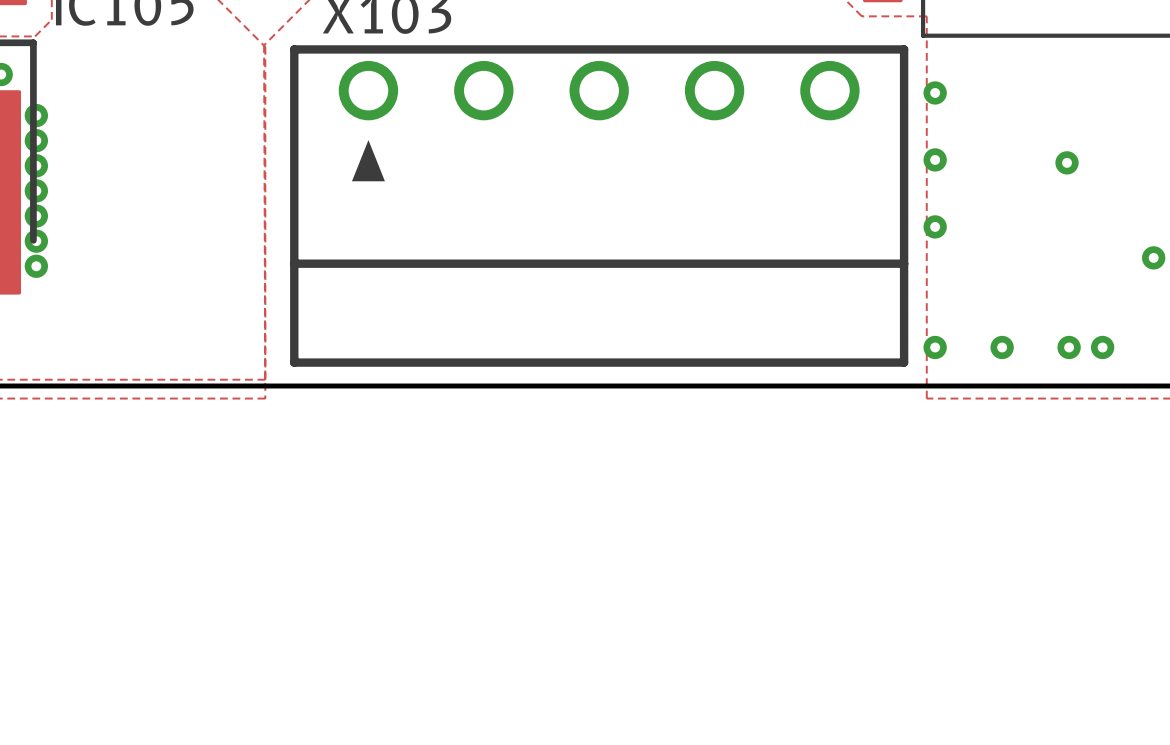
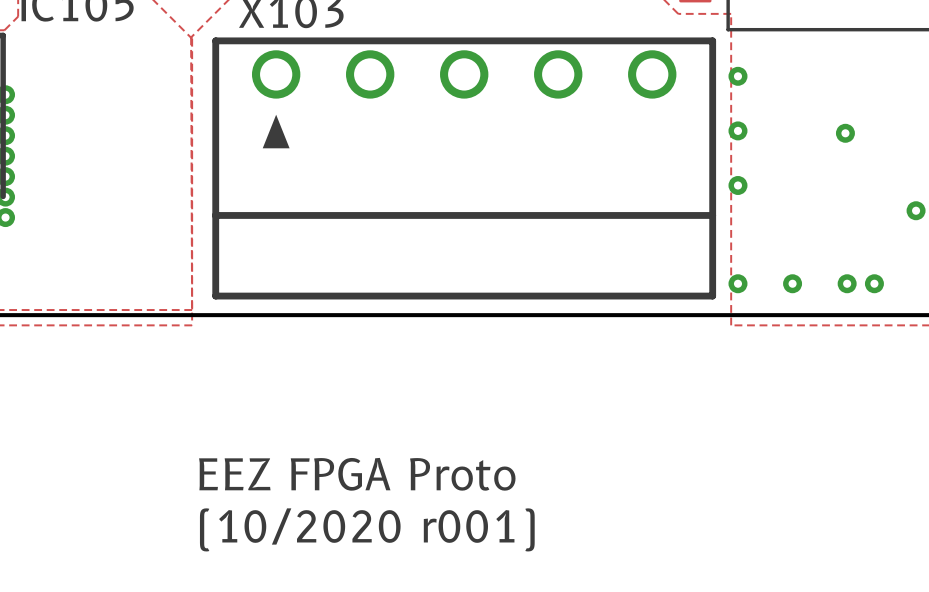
text: none -> EEZ FPGA Proto (357, 474)
text: none -> (10/2020 r001) (367, 529)

